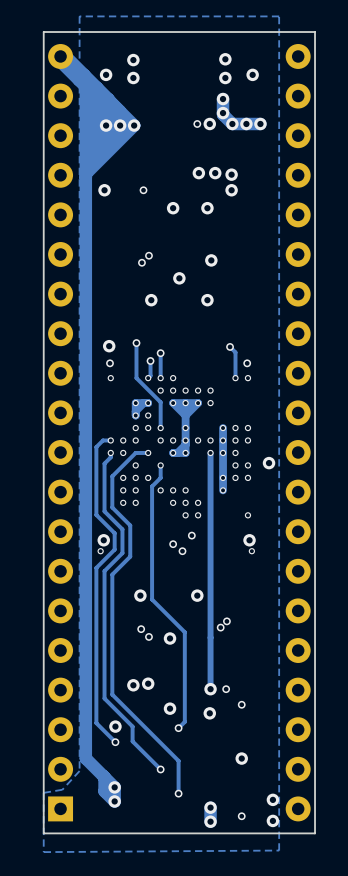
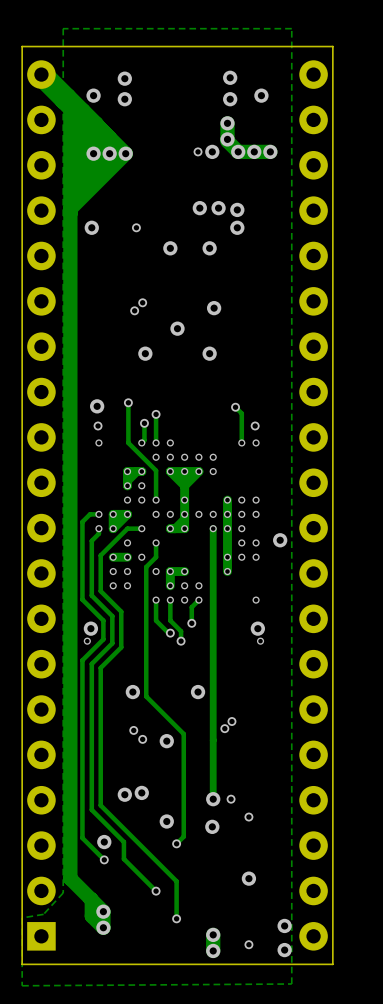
track: none -> (127, 514) (113, 514) (113, 528) (127, 514)
track: none -> (127, 557) (113, 557)
track: none -> (184, 571) (170, 571) (170, 585)
track: none -> (156, 600) (156, 620) (168, 633)
via: none -> (156, 600)
track: none -> (170, 600) (170, 620) (181, 631) (181, 641)
via: none -> (170, 600)
track: none -> (198, 600) (191, 607) (191, 619)

